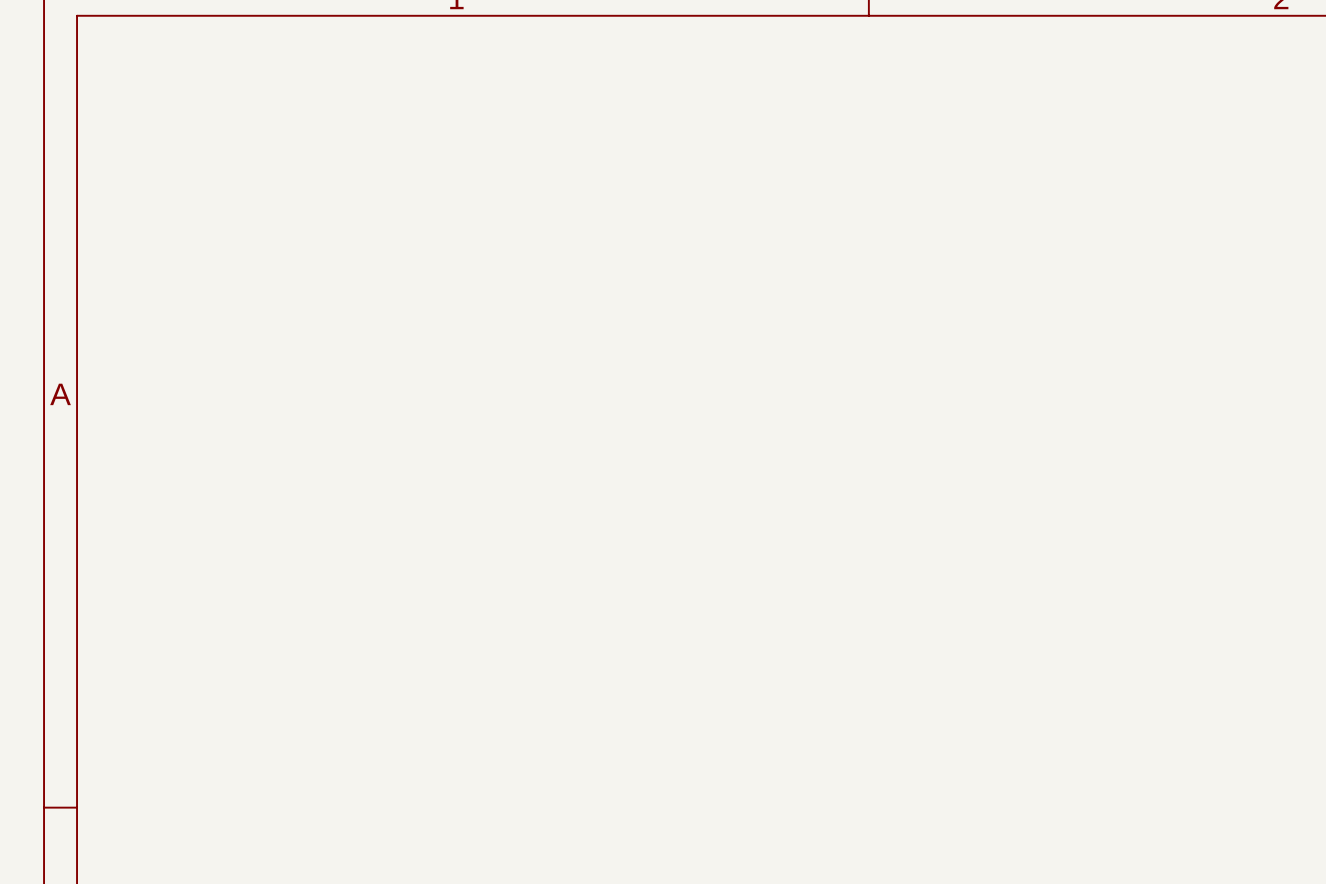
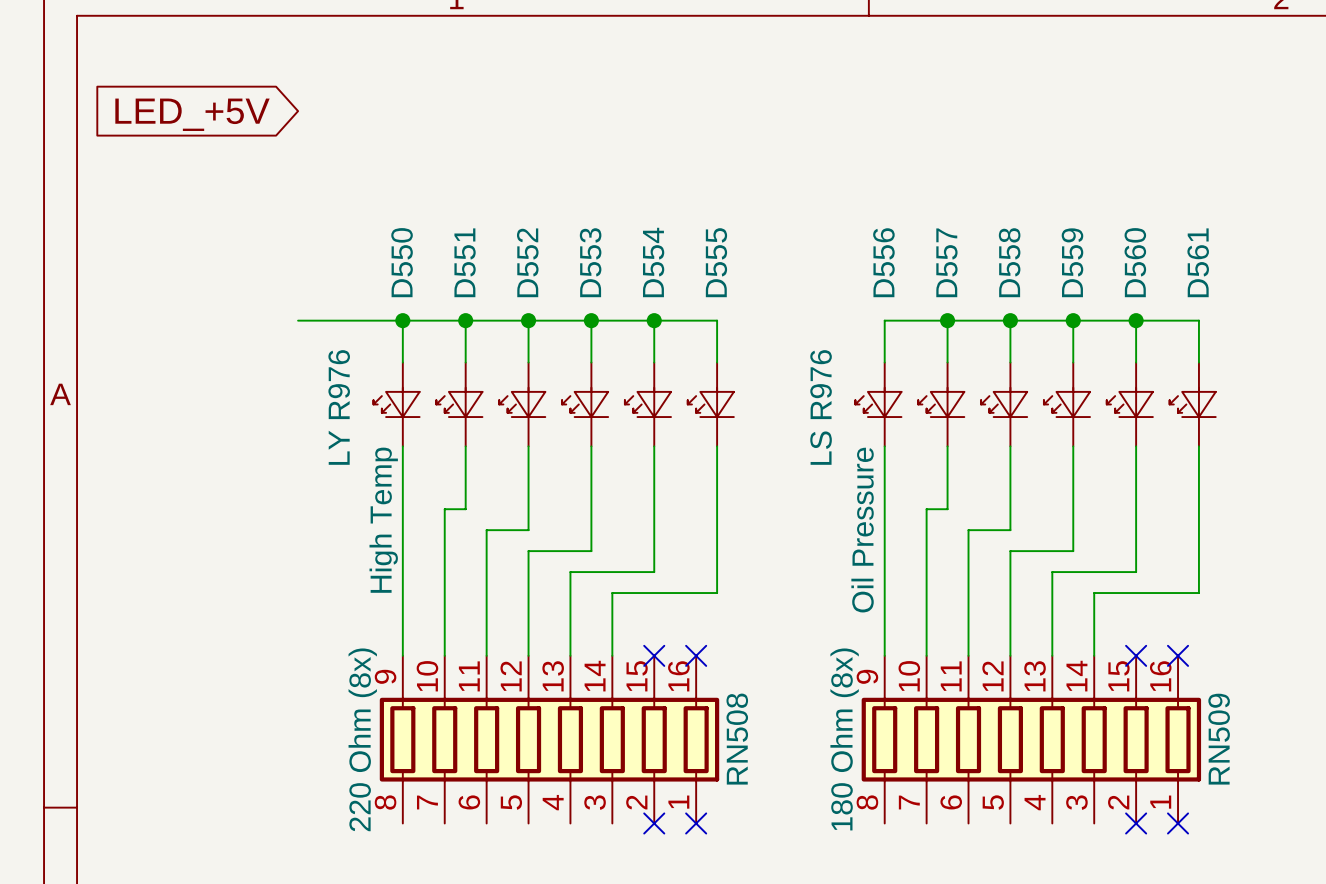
global label: none -> LED_+5V (192, 114)
wire: none -> (298, 320) (717, 320) (717, 362)
wire: none -> (402, 320) (402, 362)
junction: none -> (402, 320)
wire: none -> (465, 320) (465, 362)
junction: none -> (465, 320)
wire: none -> (528, 320) (528, 362)
junction: none -> (528, 320)
wire: none -> (591, 320) (591, 362)
junction: none -> (591, 320)
wire: none -> (654, 320) (654, 362)
junction: none -> (654, 320)
wire: none -> (947, 320) (947, 362)
junction: none -> (947, 320)
wire: none -> (1010, 320) (1010, 362)
junction: none -> (1010, 320)
wire: none -> (1073, 320) (1073, 362)
junction: none -> (1073, 320)
wire: none -> (1136, 320) (1136, 362)
junction: none -> (1136, 320)
wire: none -> (884, 362) (884, 320) (1198, 320) (1198, 362)
D550: none -> LY R976 (396, 404)
D551: none -> (459, 404)
D552: none -> (522, 404)
D553: none -> (585, 404)
D554: none -> (647, 404)
D555: none -> (710, 404)
D556: none -> LS R976 (878, 404)
D557: none -> (941, 404)
D558: none -> (1004, 404)
D559: none -> (1066, 404)
D560: none -> (1129, 404)
D561: none -> (1192, 404)
wire: none -> (402, 446) (402, 655)
wire: none -> (465, 446) (465, 509) (444, 509) (444, 655)
wire: none -> (528, 446) (528, 530) (486, 530) (486, 655)
wire: none -> (591, 446) (591, 551) (528, 551) (528, 655)
wire: none -> (654, 446) (654, 572) (570, 572) (570, 655)
wire: none -> (717, 446) (717, 593) (612, 593) (612, 655)
wire: none -> (884, 446) (884, 655)
wire: none -> (947, 446) (947, 509) (926, 509) (926, 655)
wire: none -> (1010, 446) (1010, 530) (968, 530) (968, 655)
wire: none -> (1073, 446) (1073, 551) (1010, 551) (1010, 655)
wire: none -> (1136, 446) (1136, 572) (1052, 572) (1052, 655)
wire: none -> (1198, 446) (1198, 593) (1094, 593) (1094, 655)
no-connect mark: none -> (654, 655)
no-connect mark: none -> (696, 655)
no-connect mark: none -> (1136, 655)
no-connect mark: none -> (1178, 655)
RN508: none -> 220 Ohm (8x) (549, 739)
RN509: none -> 180 Ohm (8x) (1031, 739)
no-connect mark: none -> (654, 823)
no-connect mark: none -> (696, 823)
no-connect mark: none -> (1136, 823)
no-connect mark: none -> (1178, 823)

